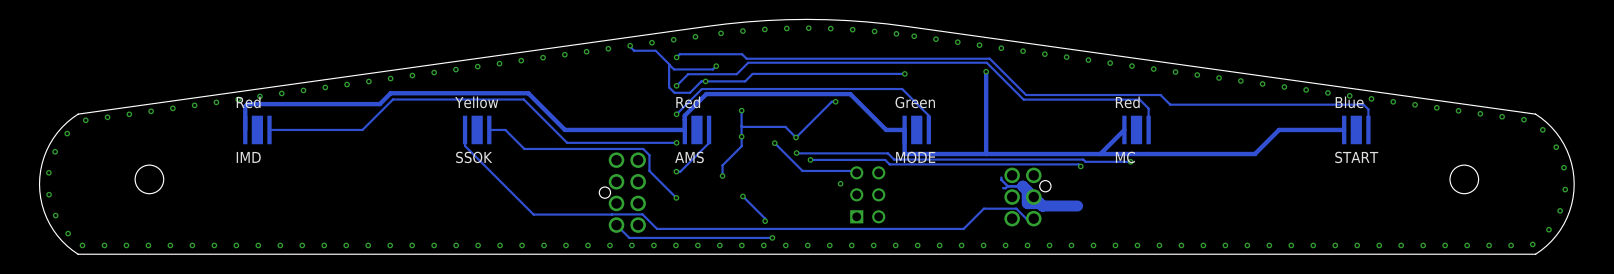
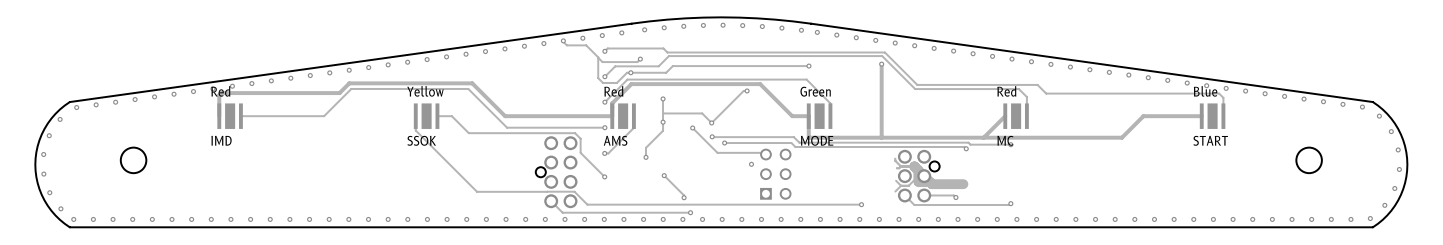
track: none -> (918, 176) (908, 185) (900, 185) (895, 191)
track: none -> (896, 180) (900, 185) (908, 185)
track: none -> (904, 195) (914, 205) (1010, 203)
track: (1033, 218) (1026, 218) (1016, 208) (983, 208) (963, 228) -> (924, 195) (953, 195) (955, 197)
via: none -> (955, 197)
via: none -> (1010, 203)
via: none -> (861, 204)

